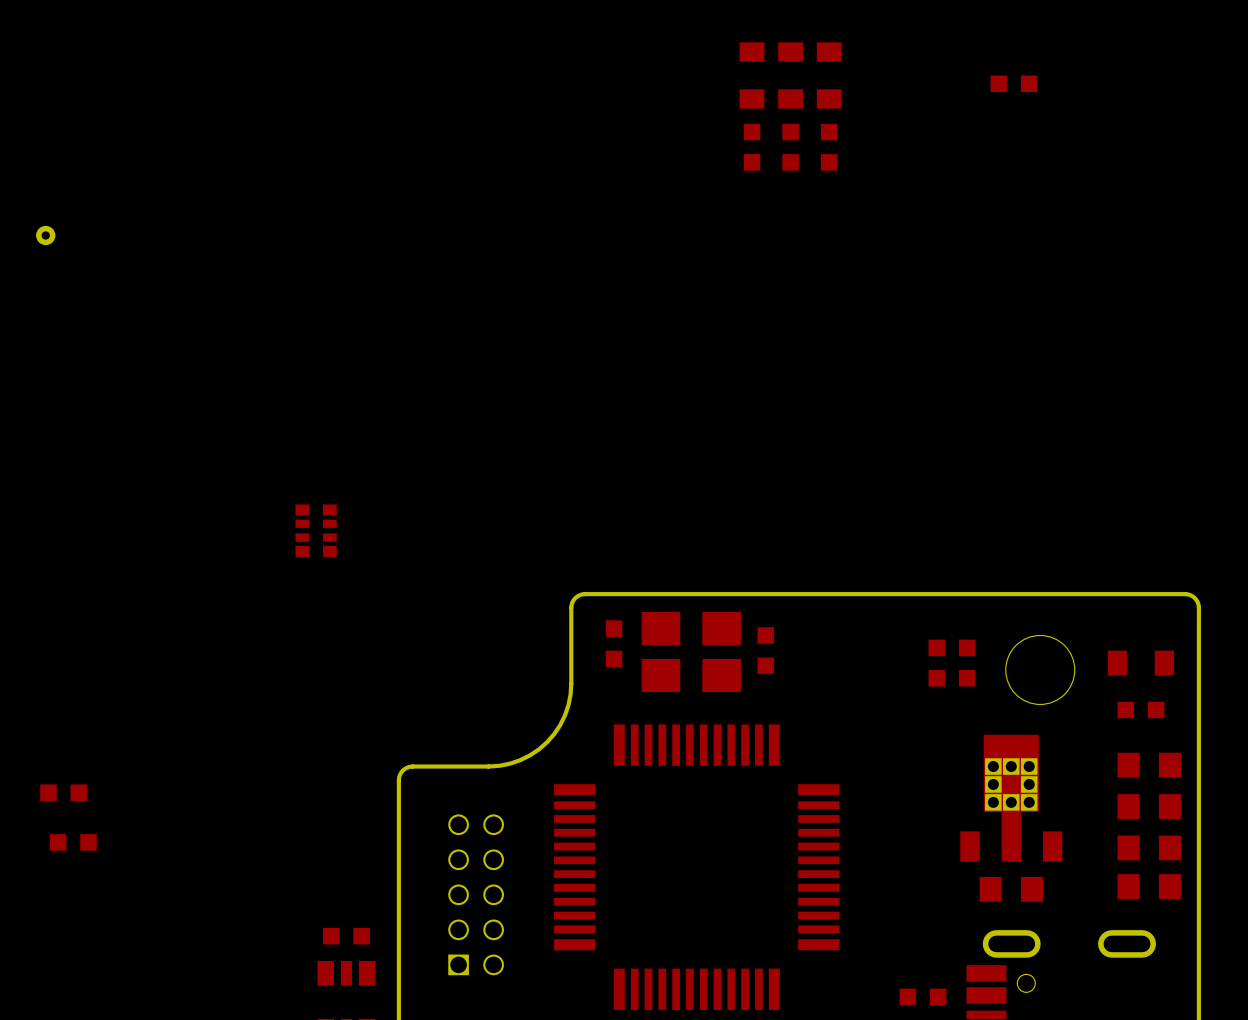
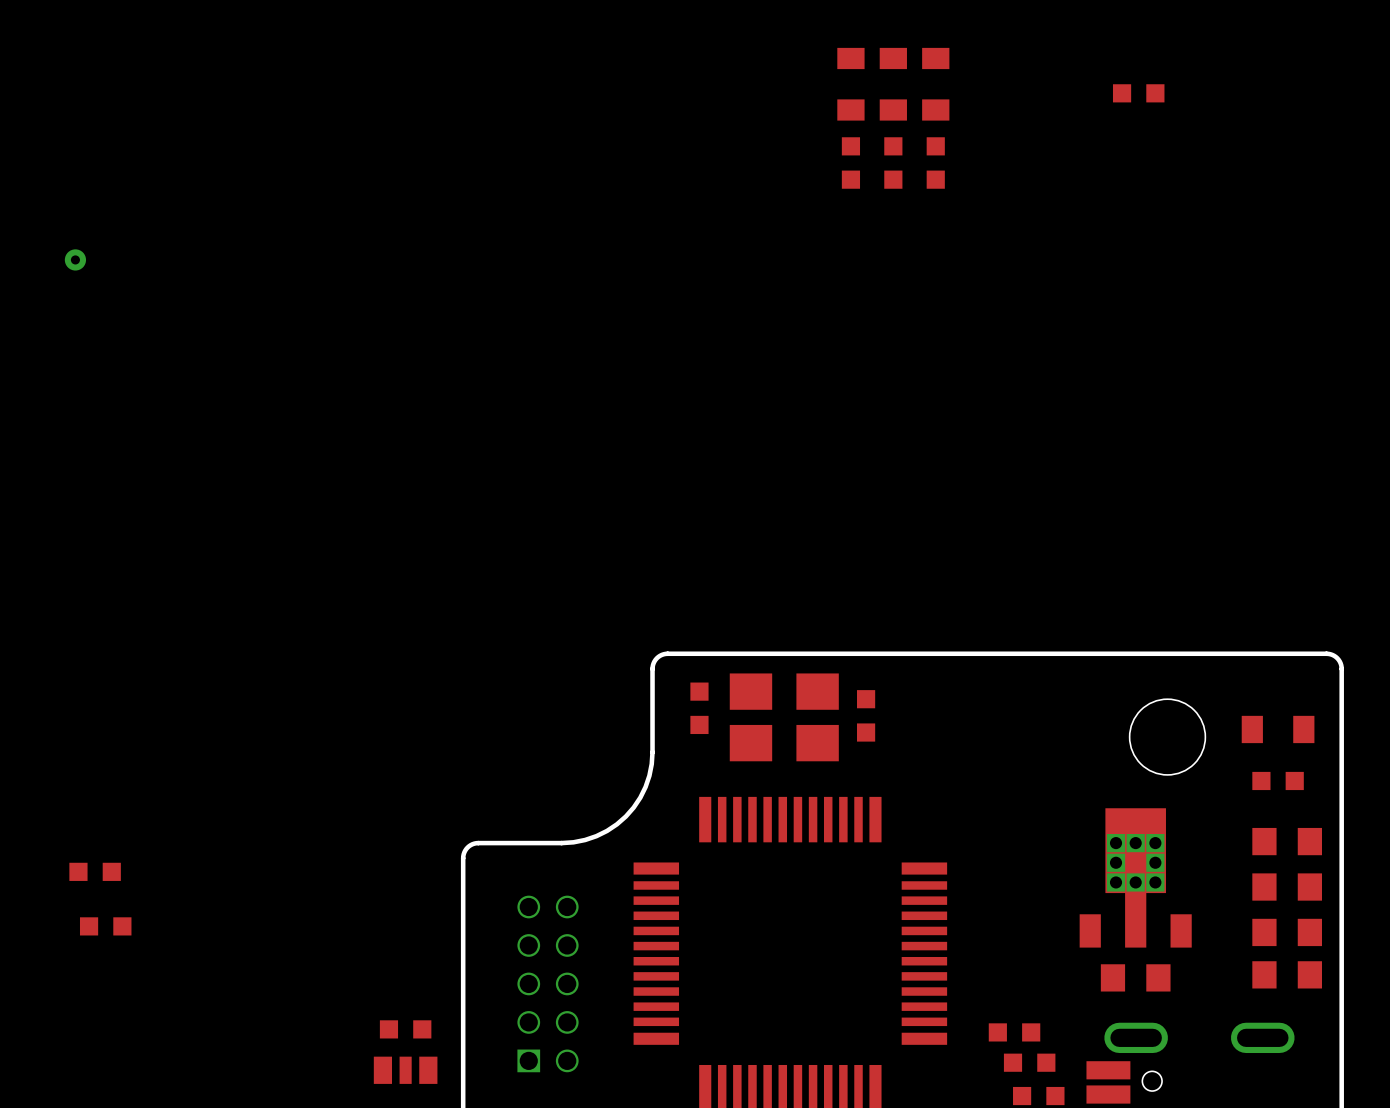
part: (316, 530) -> none
part: (936, 663) -> none
part: (967, 663) -> none
part: none -> (1014, 1032)
part: none -> (1029, 1062)

